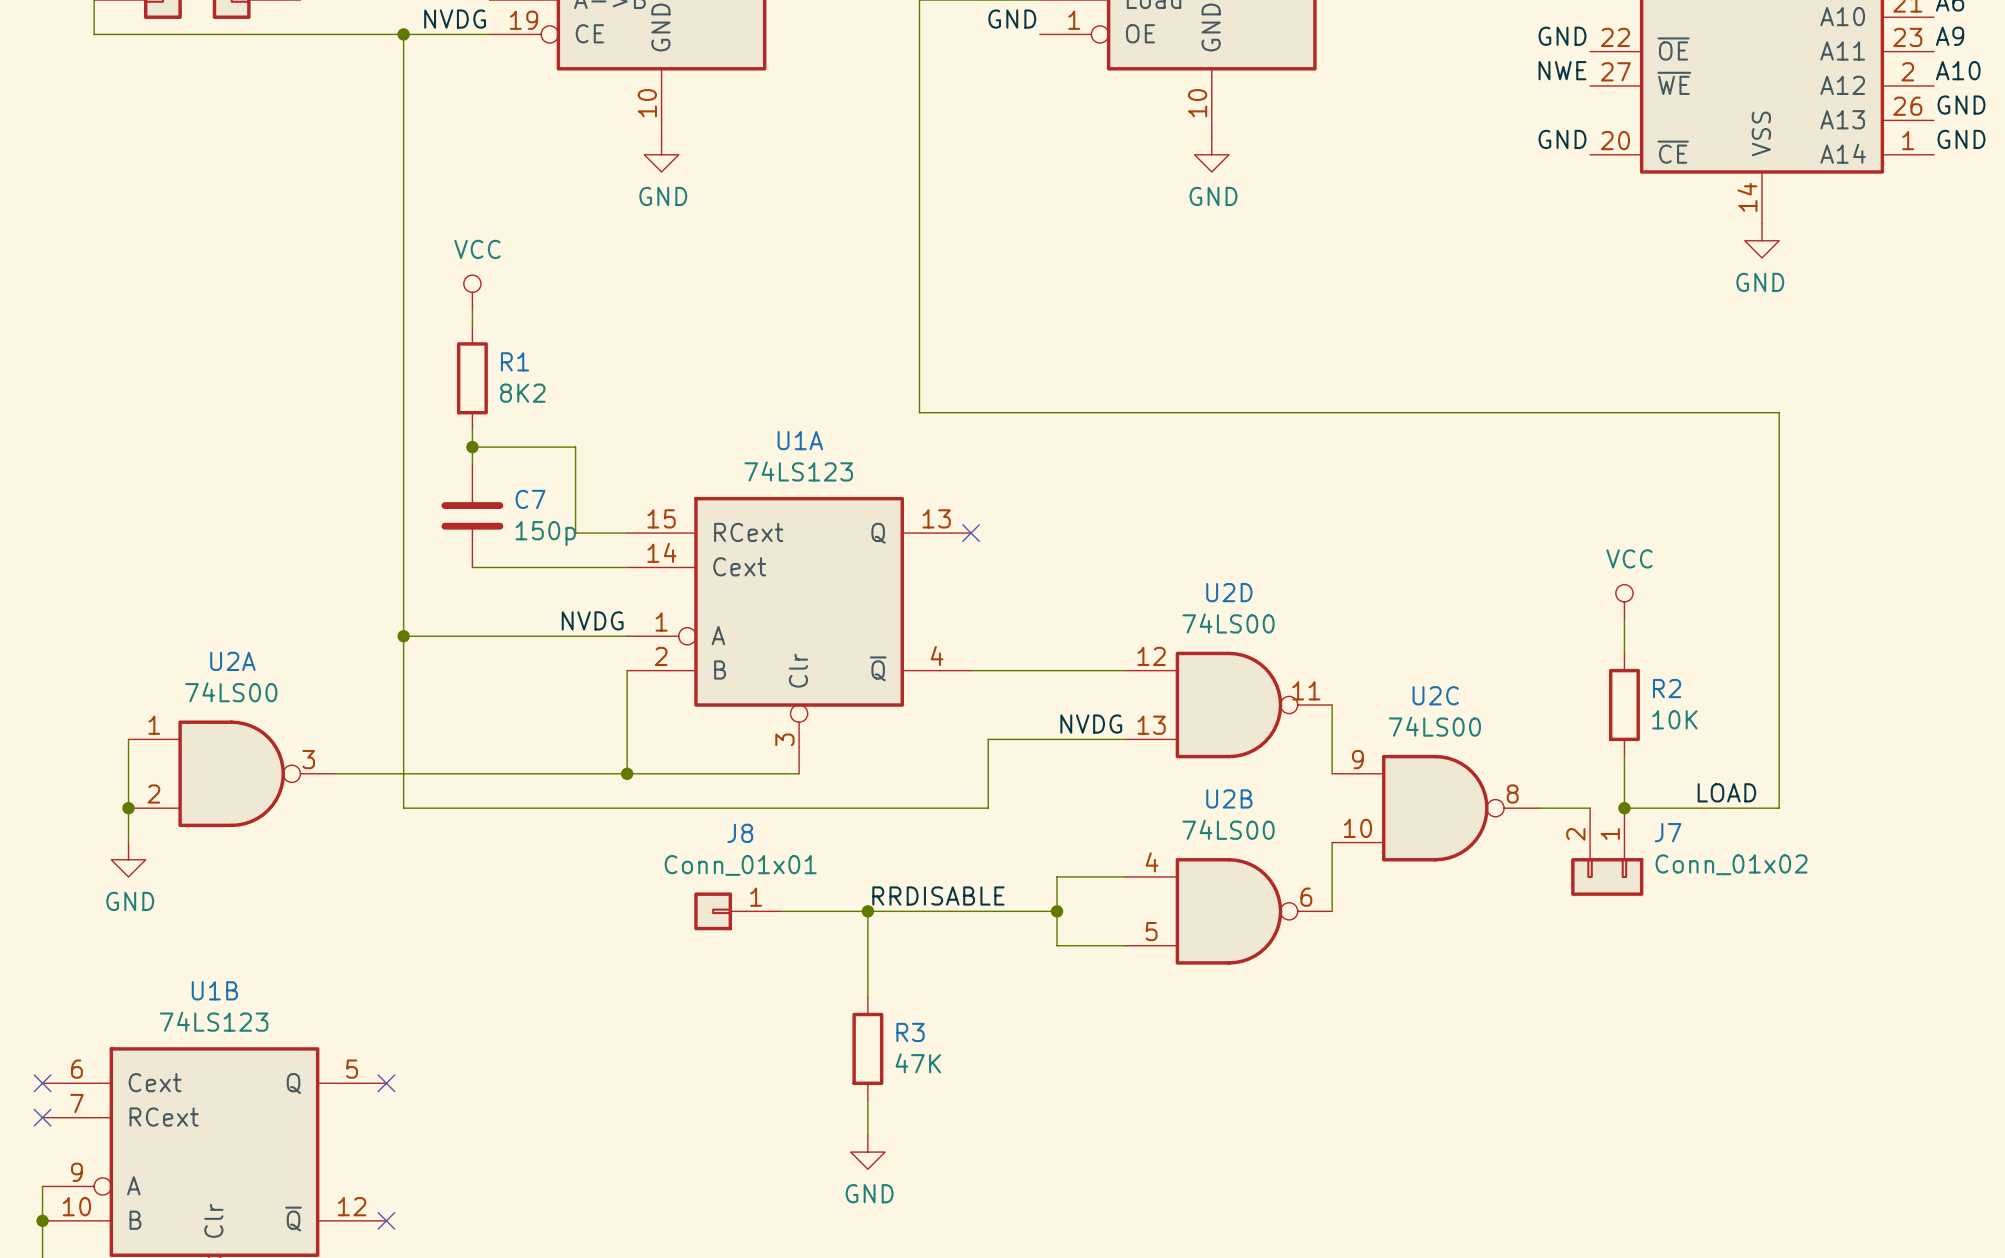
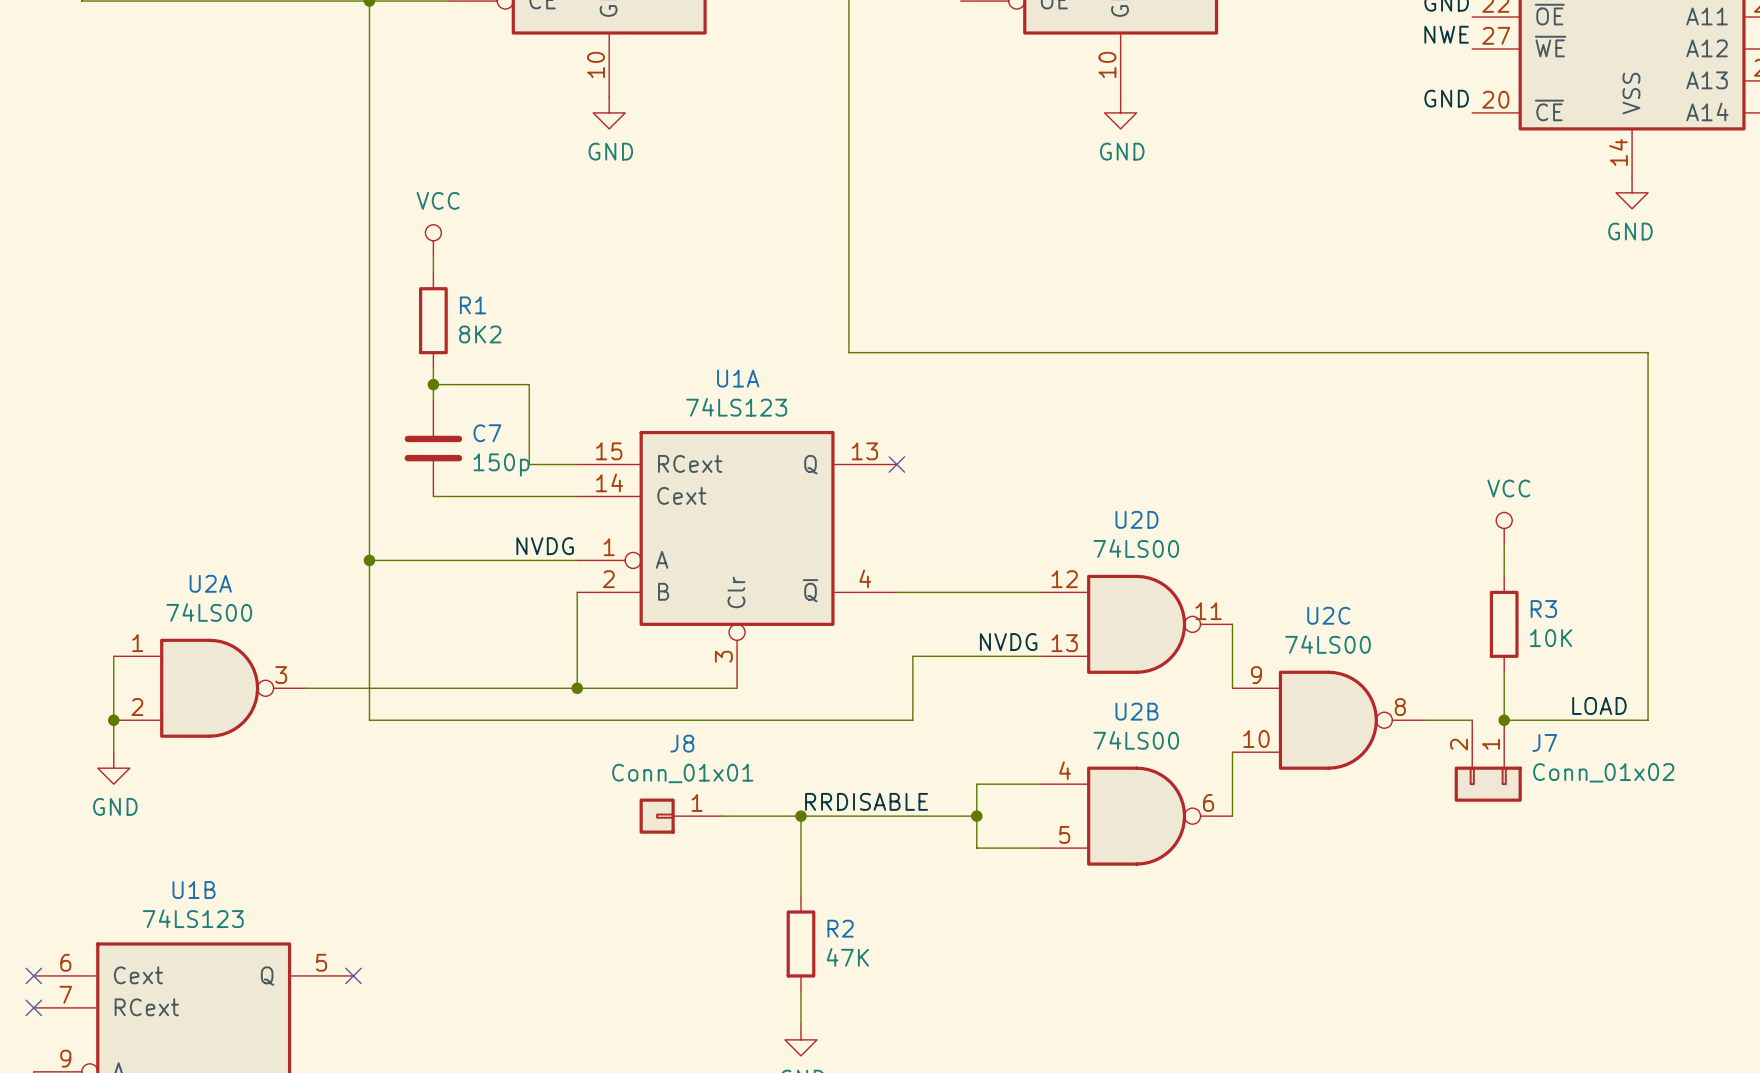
R2 name: R2 (1667, 688) -> R3 (1543, 609)
R3 name: R3 (910, 1032) -> R2 (840, 928)

